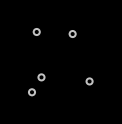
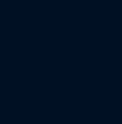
via: (36, 32) -> none
via: (72, 34) -> none
via: (41, 77) -> none
via: (89, 81) -> none
via: (32, 92) -> none

